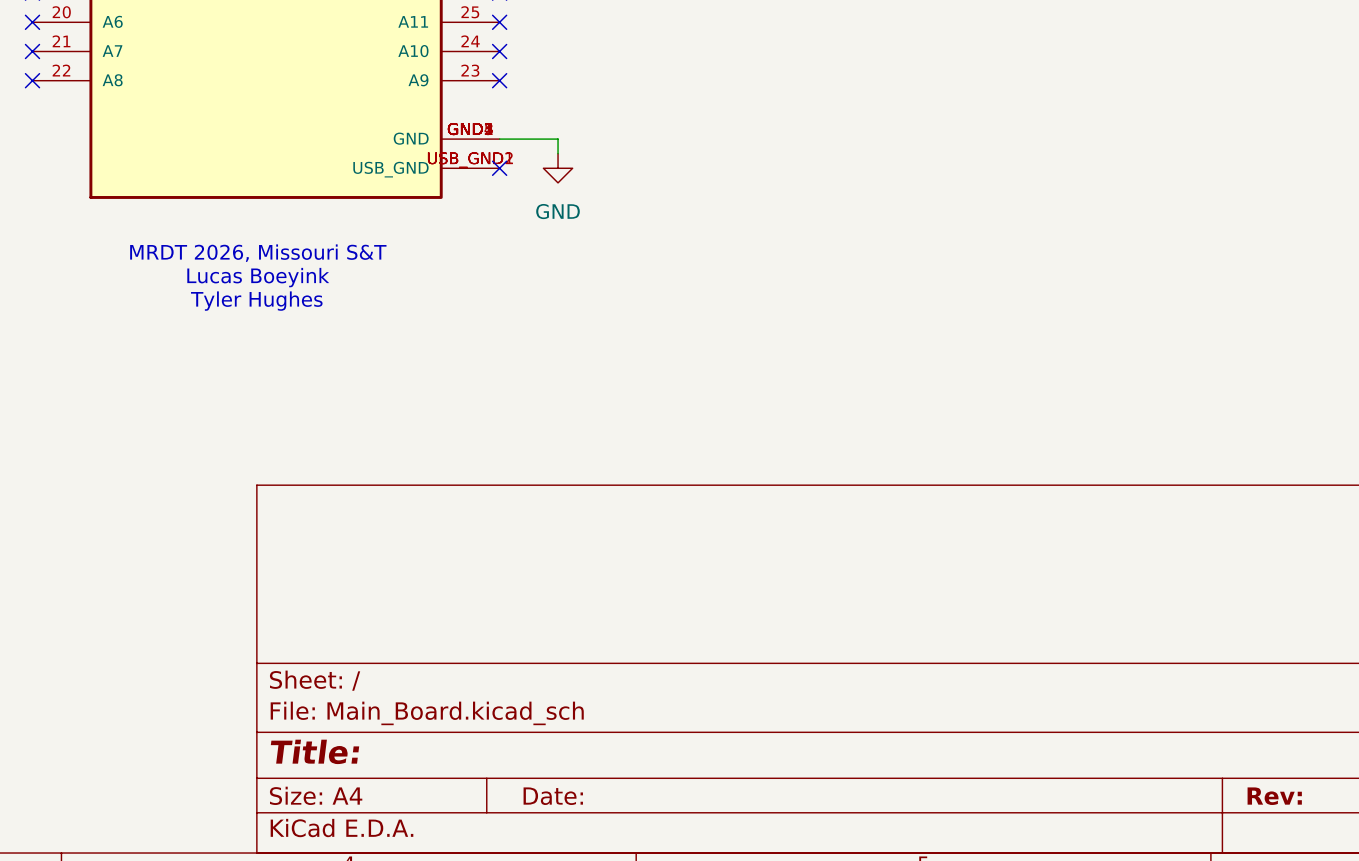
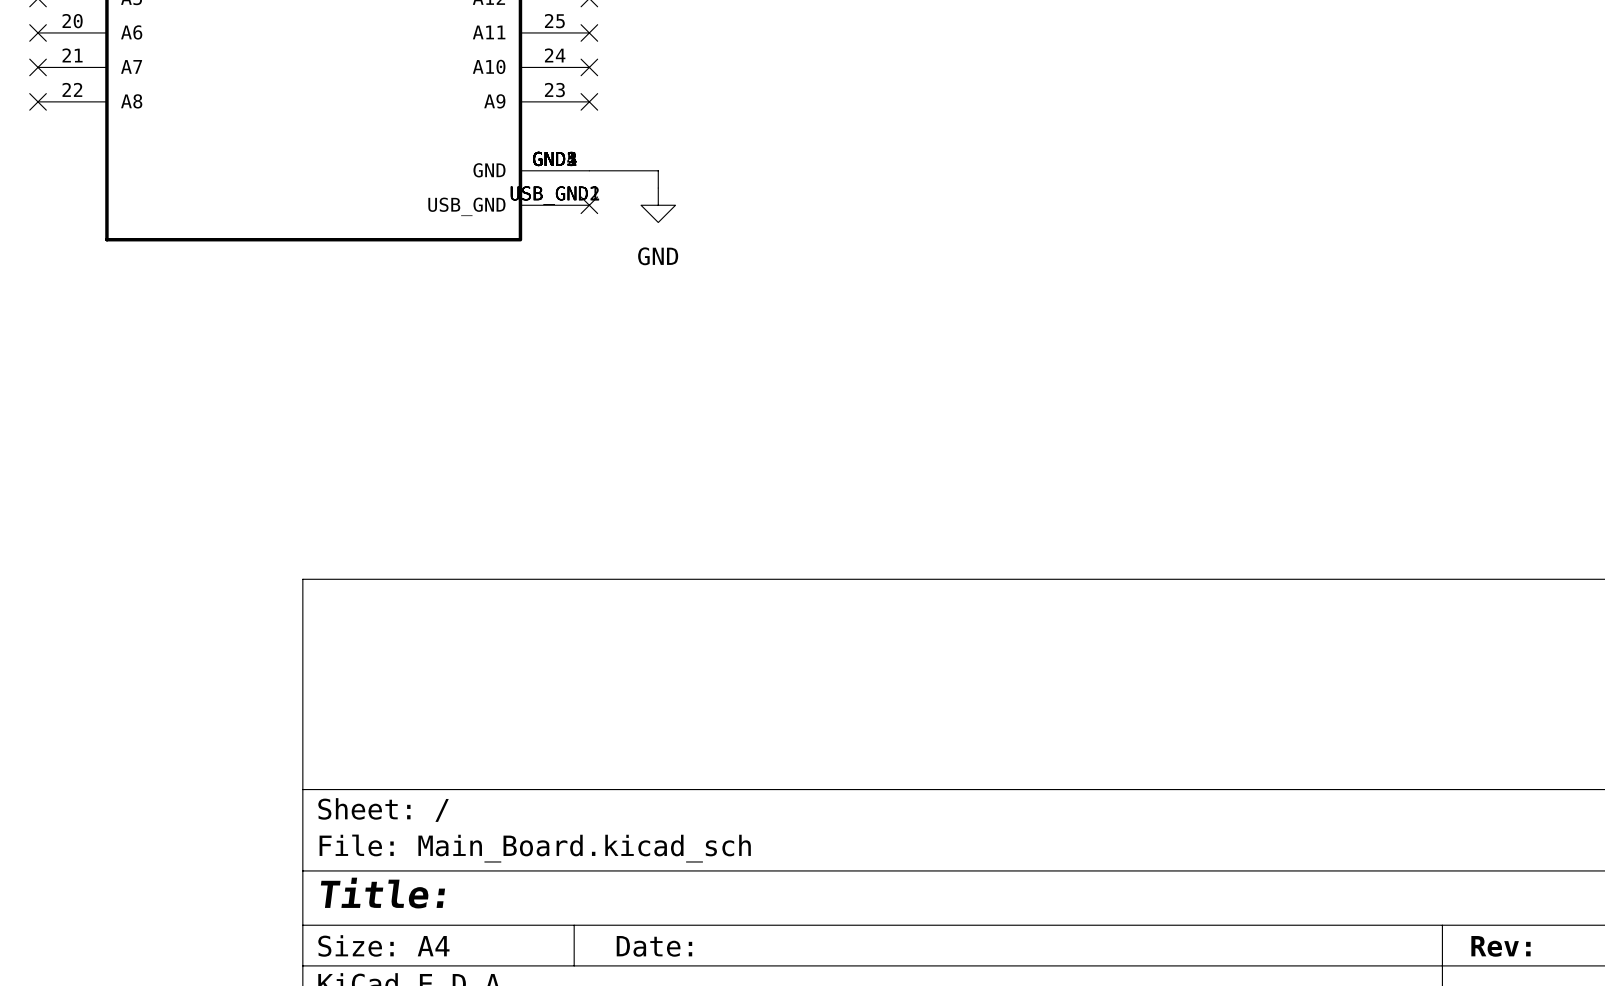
text: MRDT 2026, Missouri S&T (258, 253) -> none
text: Lucas Boeyink (258, 277) -> none
text: Tyler Hughes (256, 301) -> none

